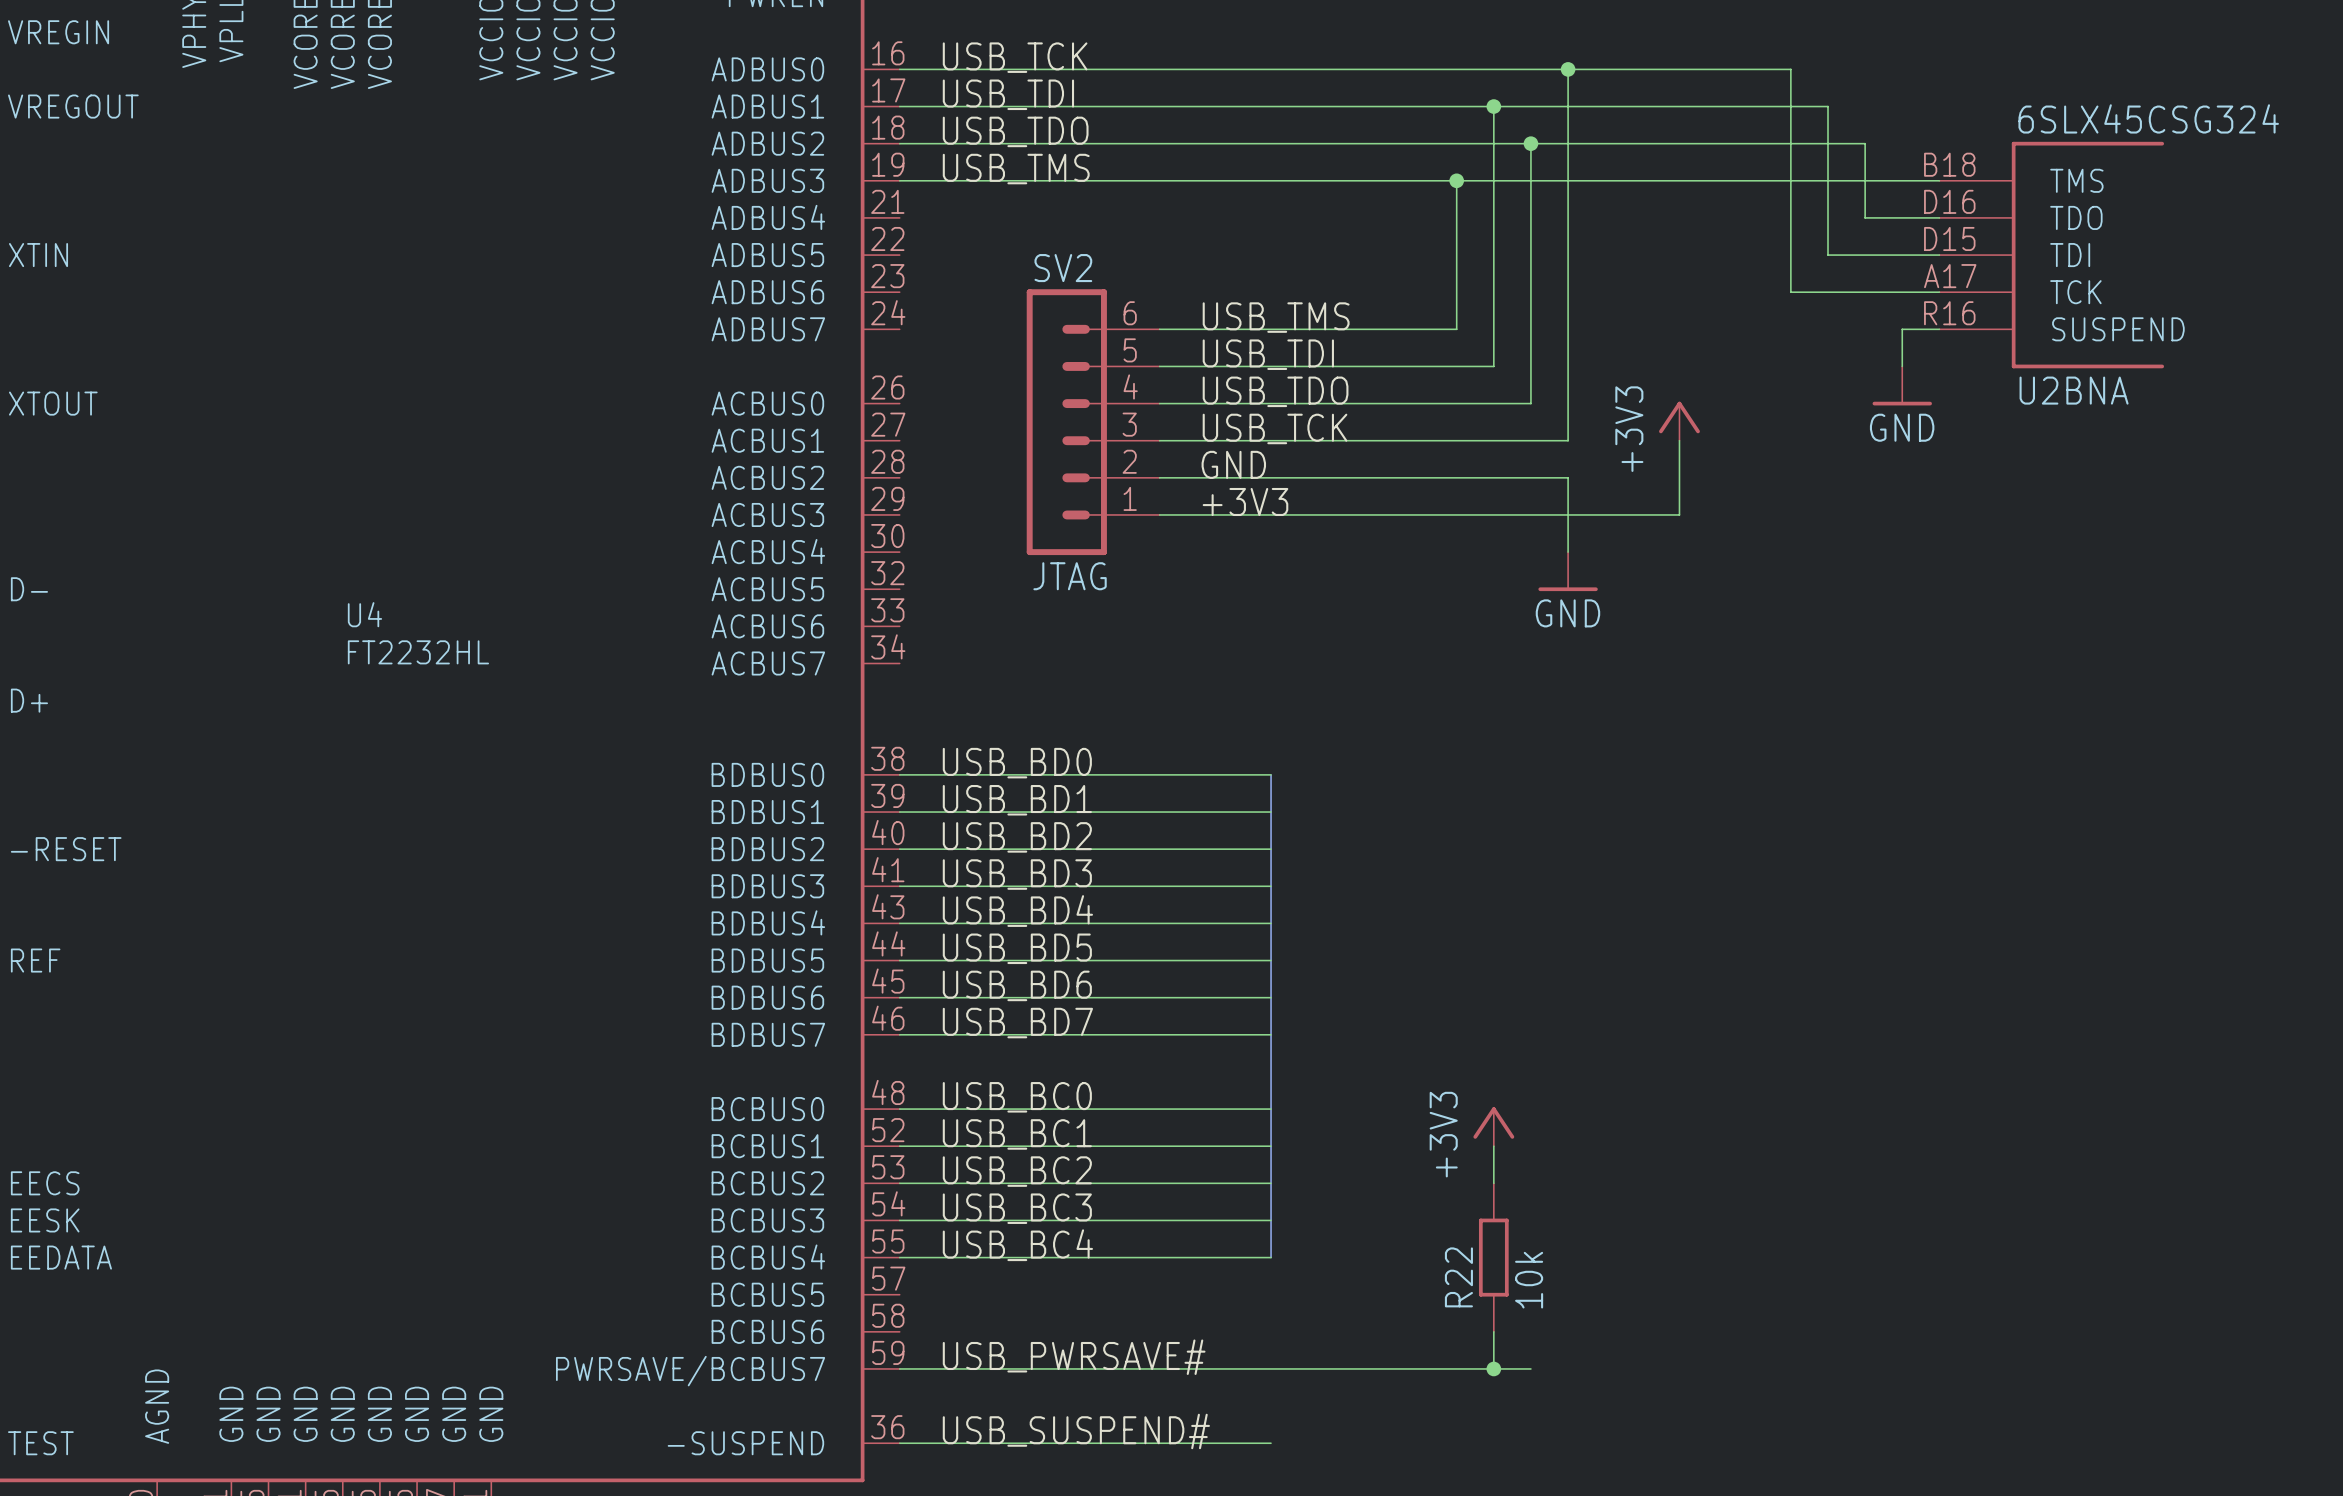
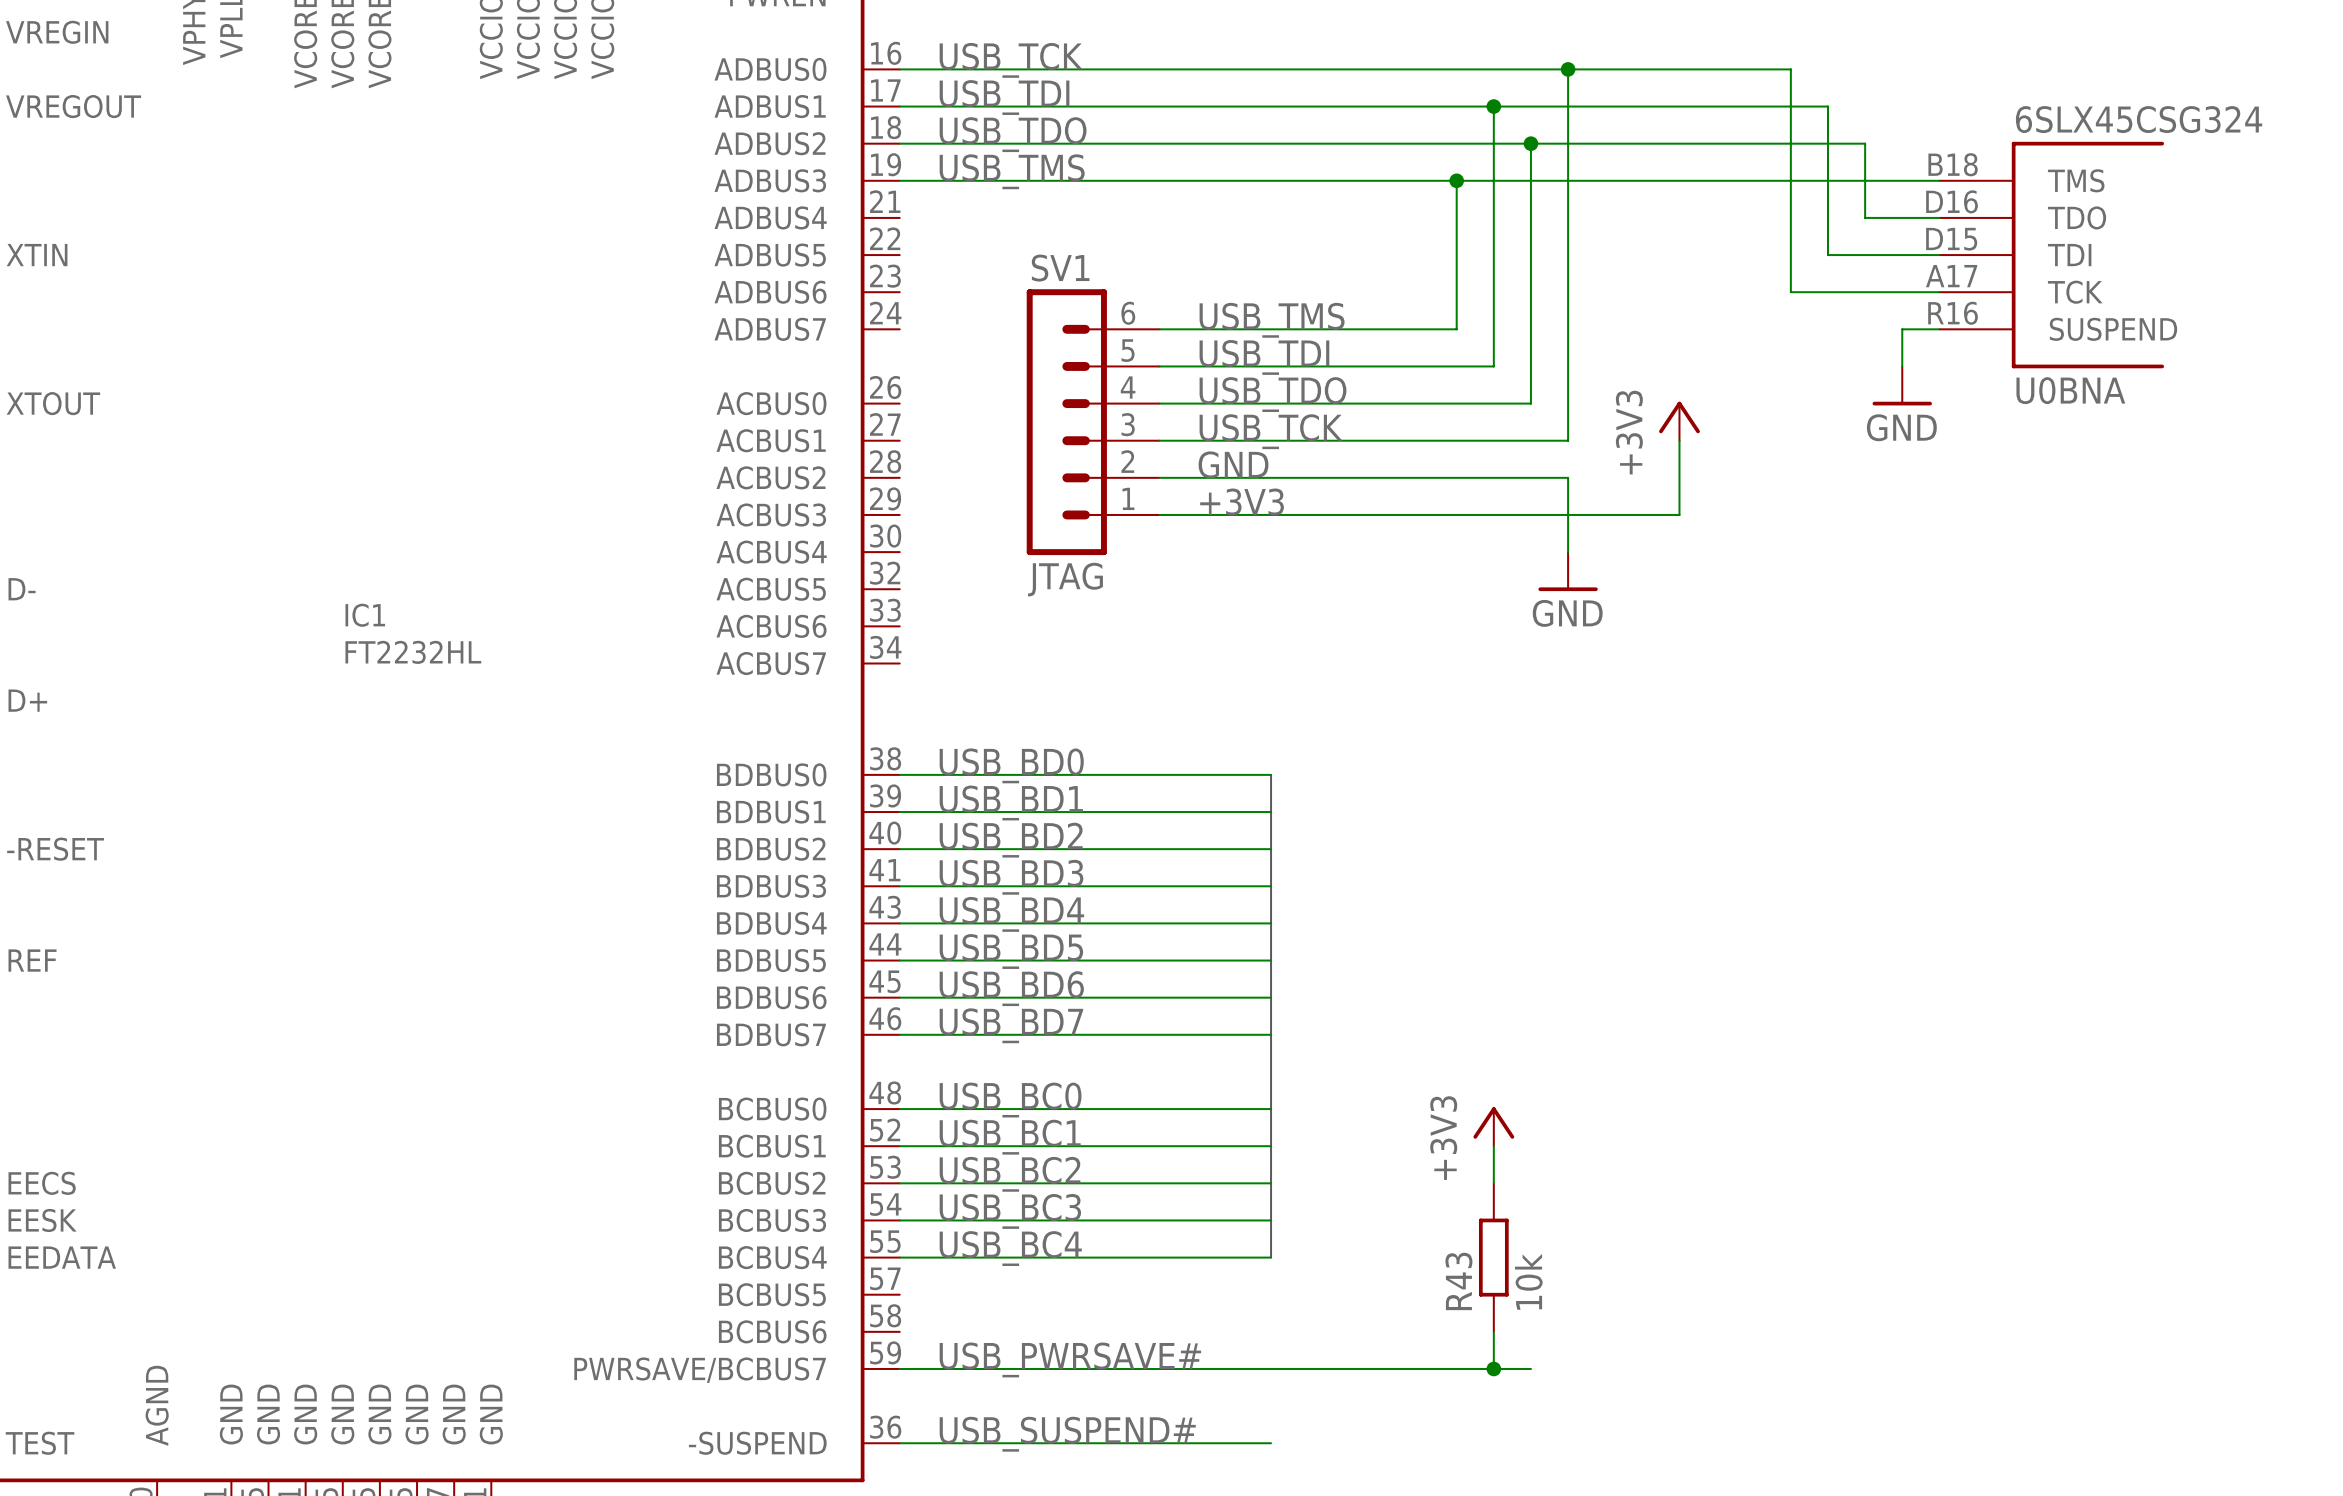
SV2 name: SV2 (1063, 268) -> SV1 (1060, 268)
U2BNA name: U2BNA (2074, 390) -> U0BNA (2070, 390)
U4 name: U4 (364, 614) -> IC1 (365, 615)
R22 name: R22 (1458, 1277) -> R43 (1458, 1281)

